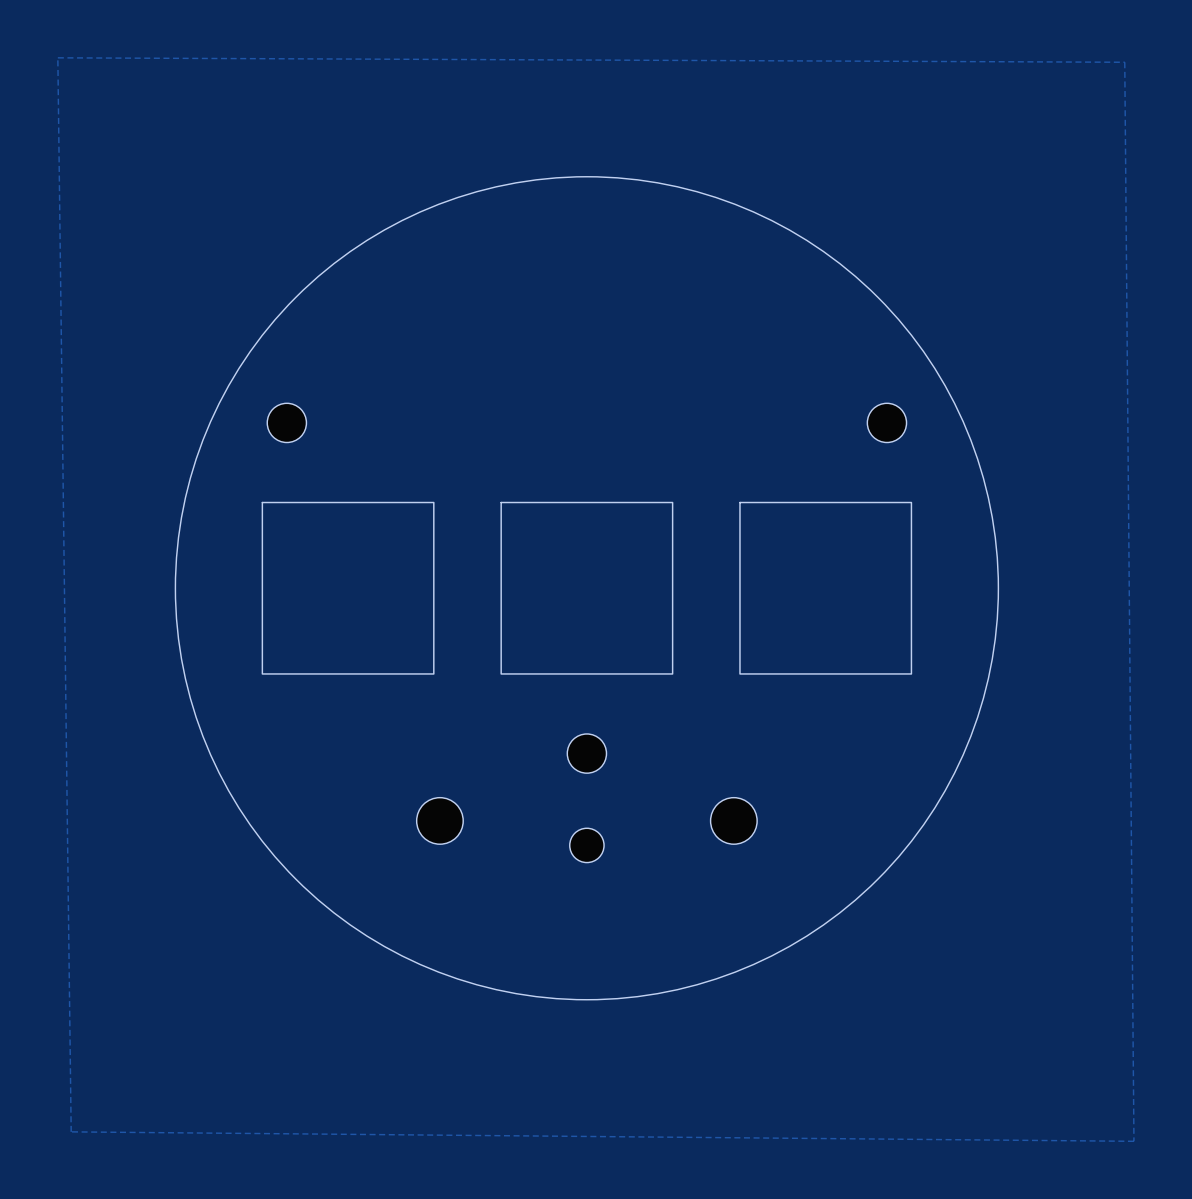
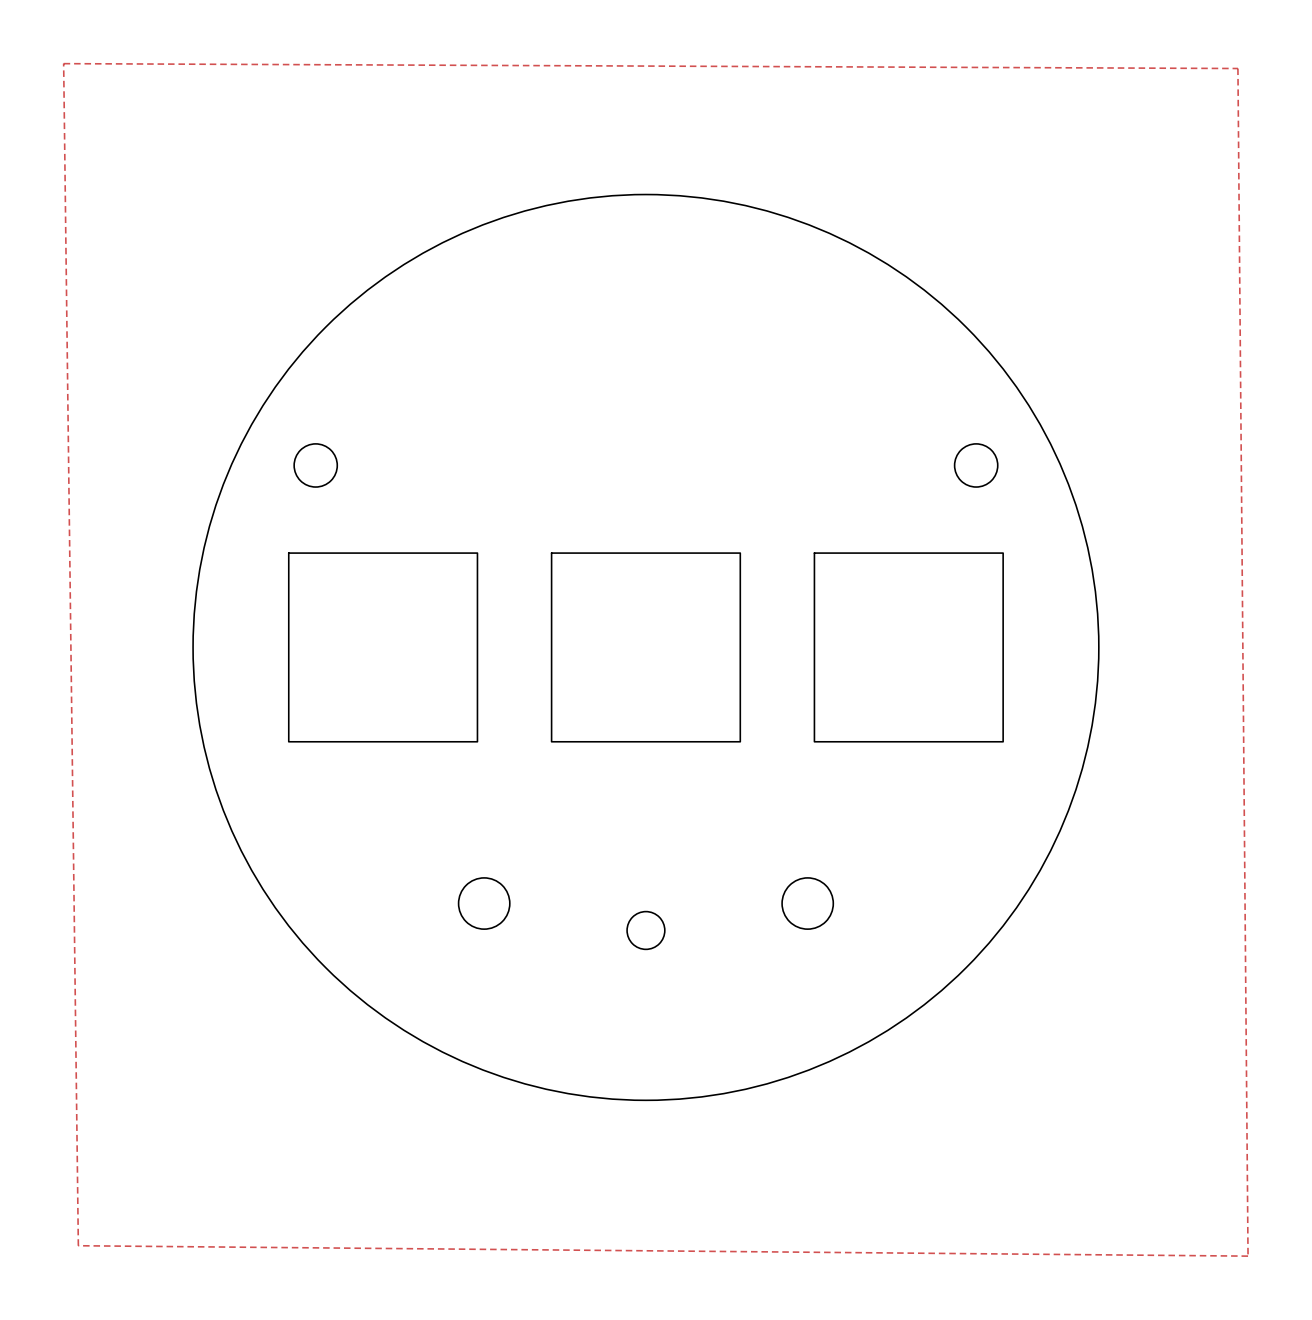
part: (586, 753) -> none

